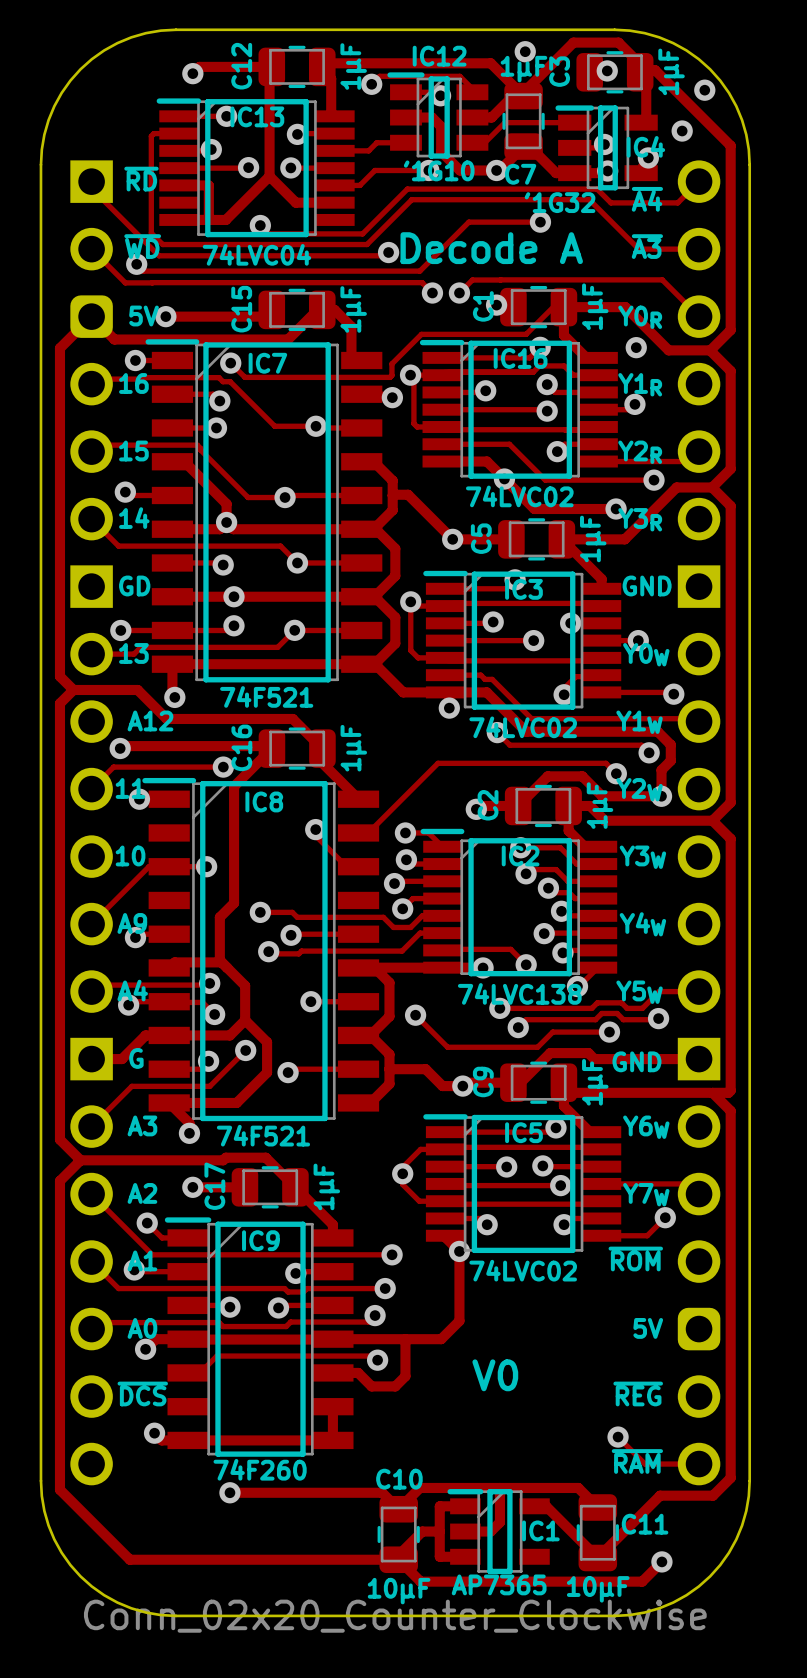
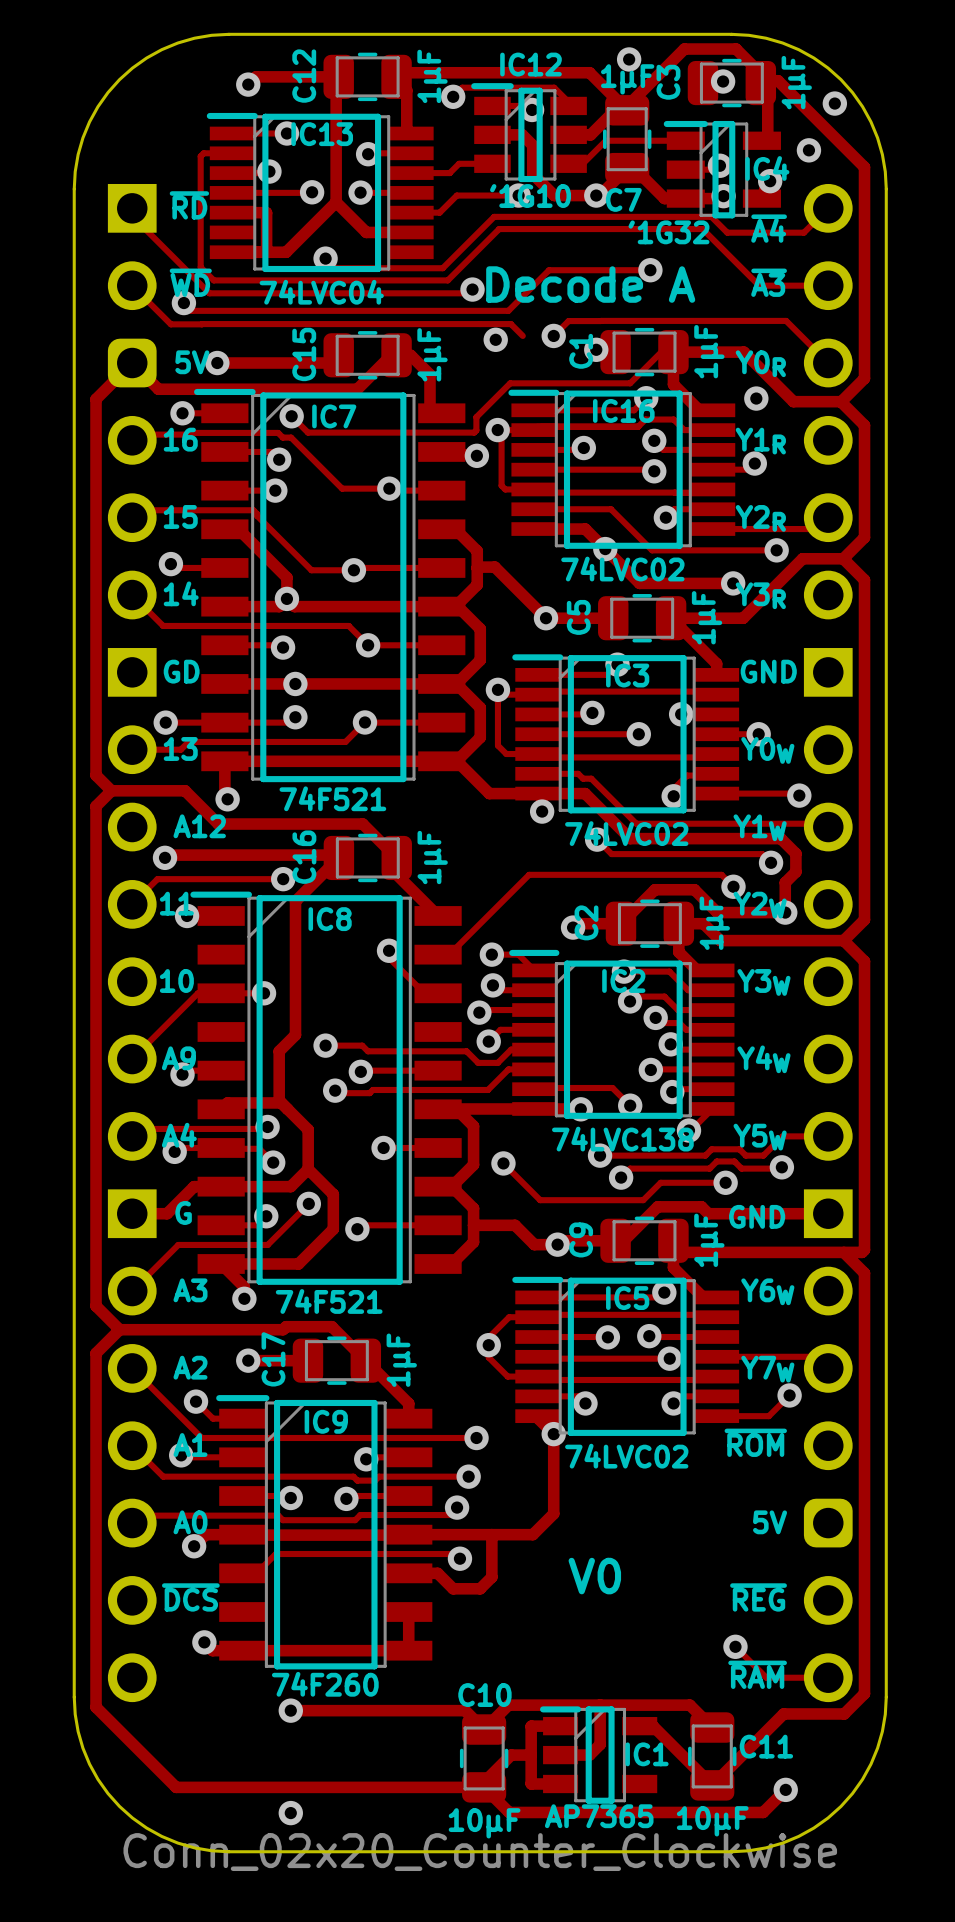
track: (540, 222) (468, 222) (455, 235) -> (650, 270) (549, 270)
via position: (540, 222) -> (650, 270)
via position: (432, 293) -> (495, 339)
via: none -> (290, 1813)

